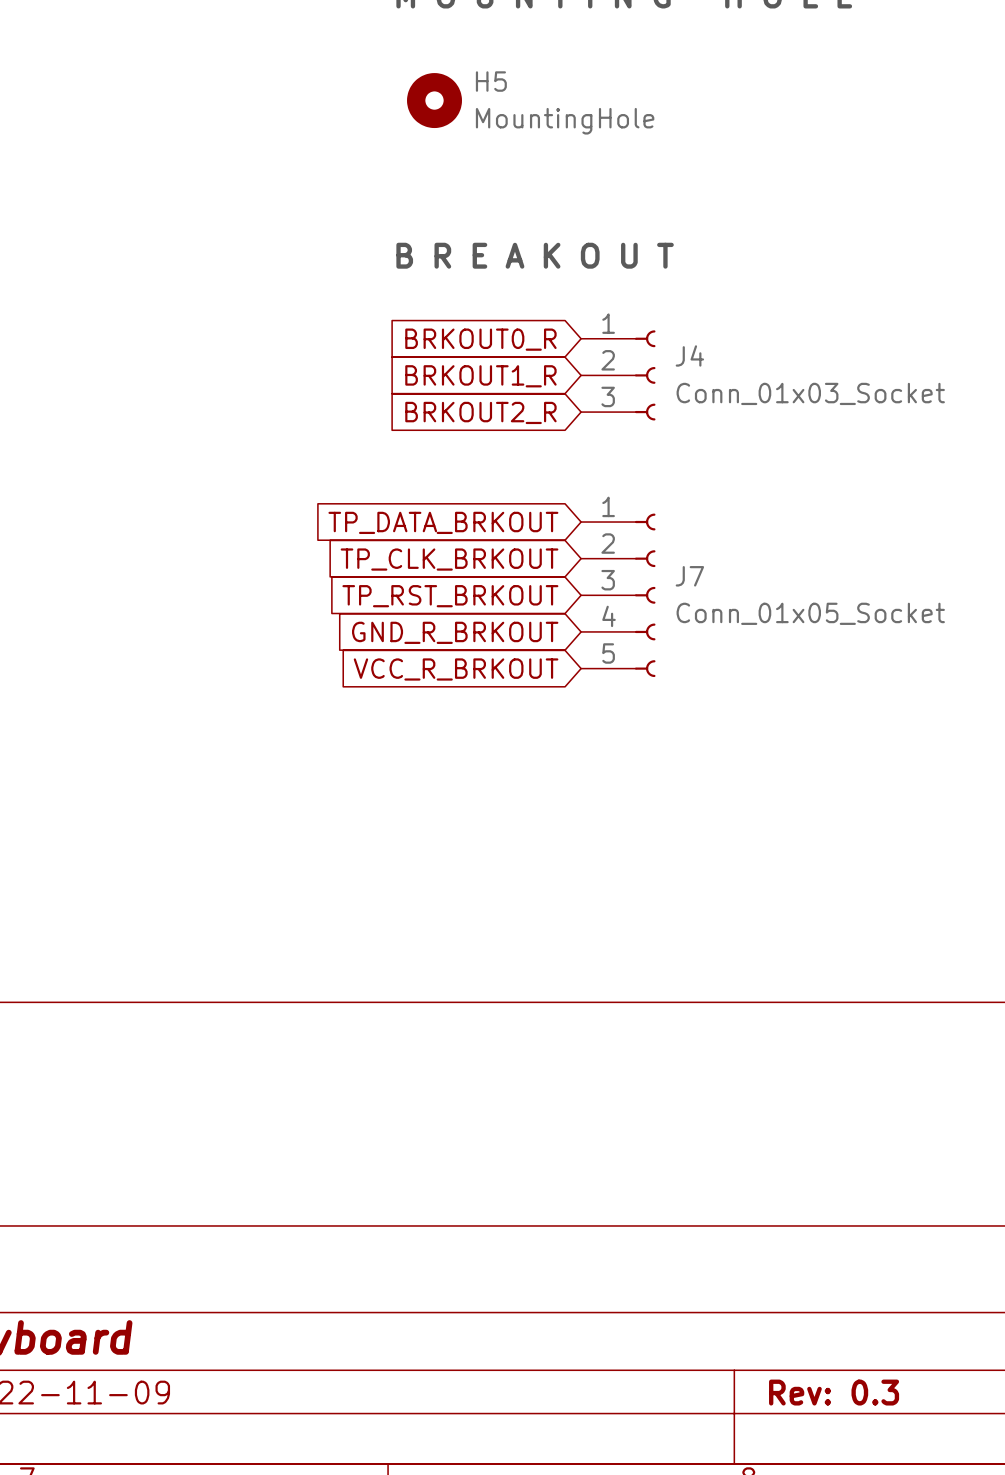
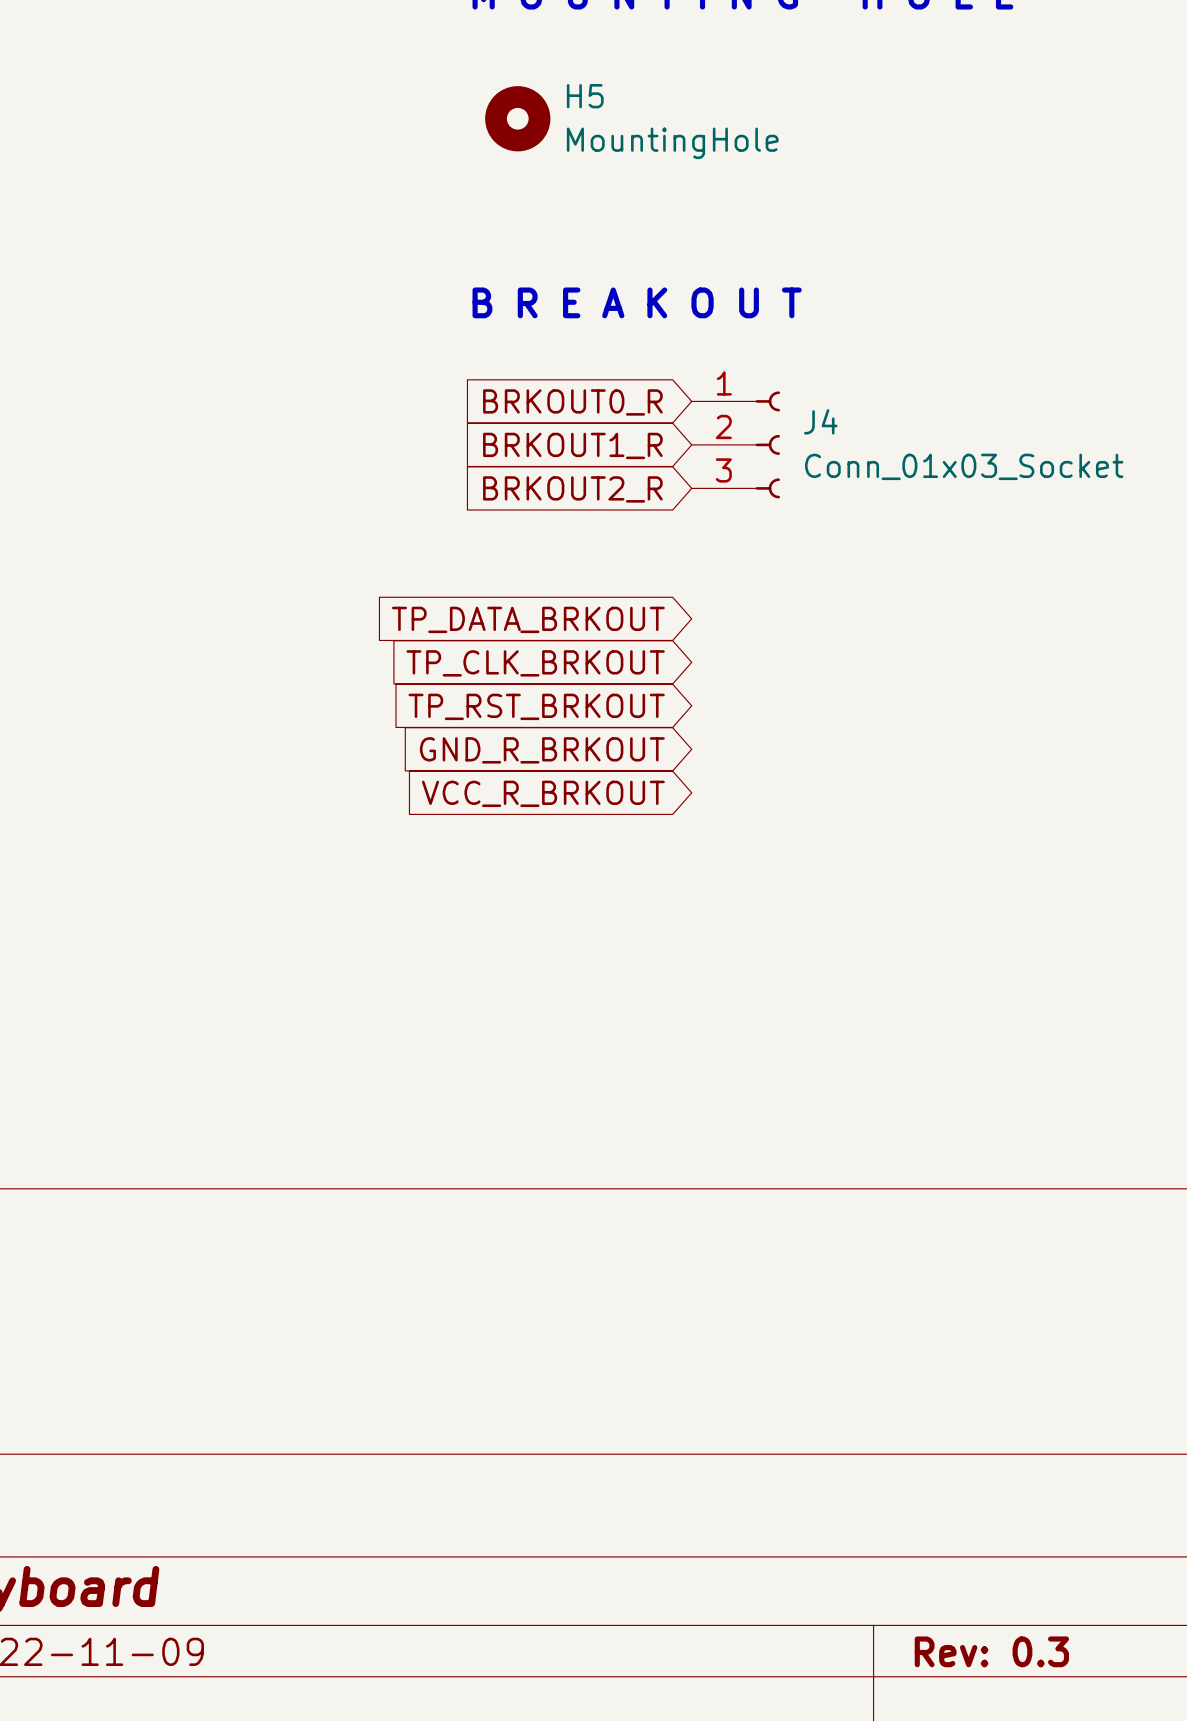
J7: Conn_01x05_Socket (618, 595) -> none

